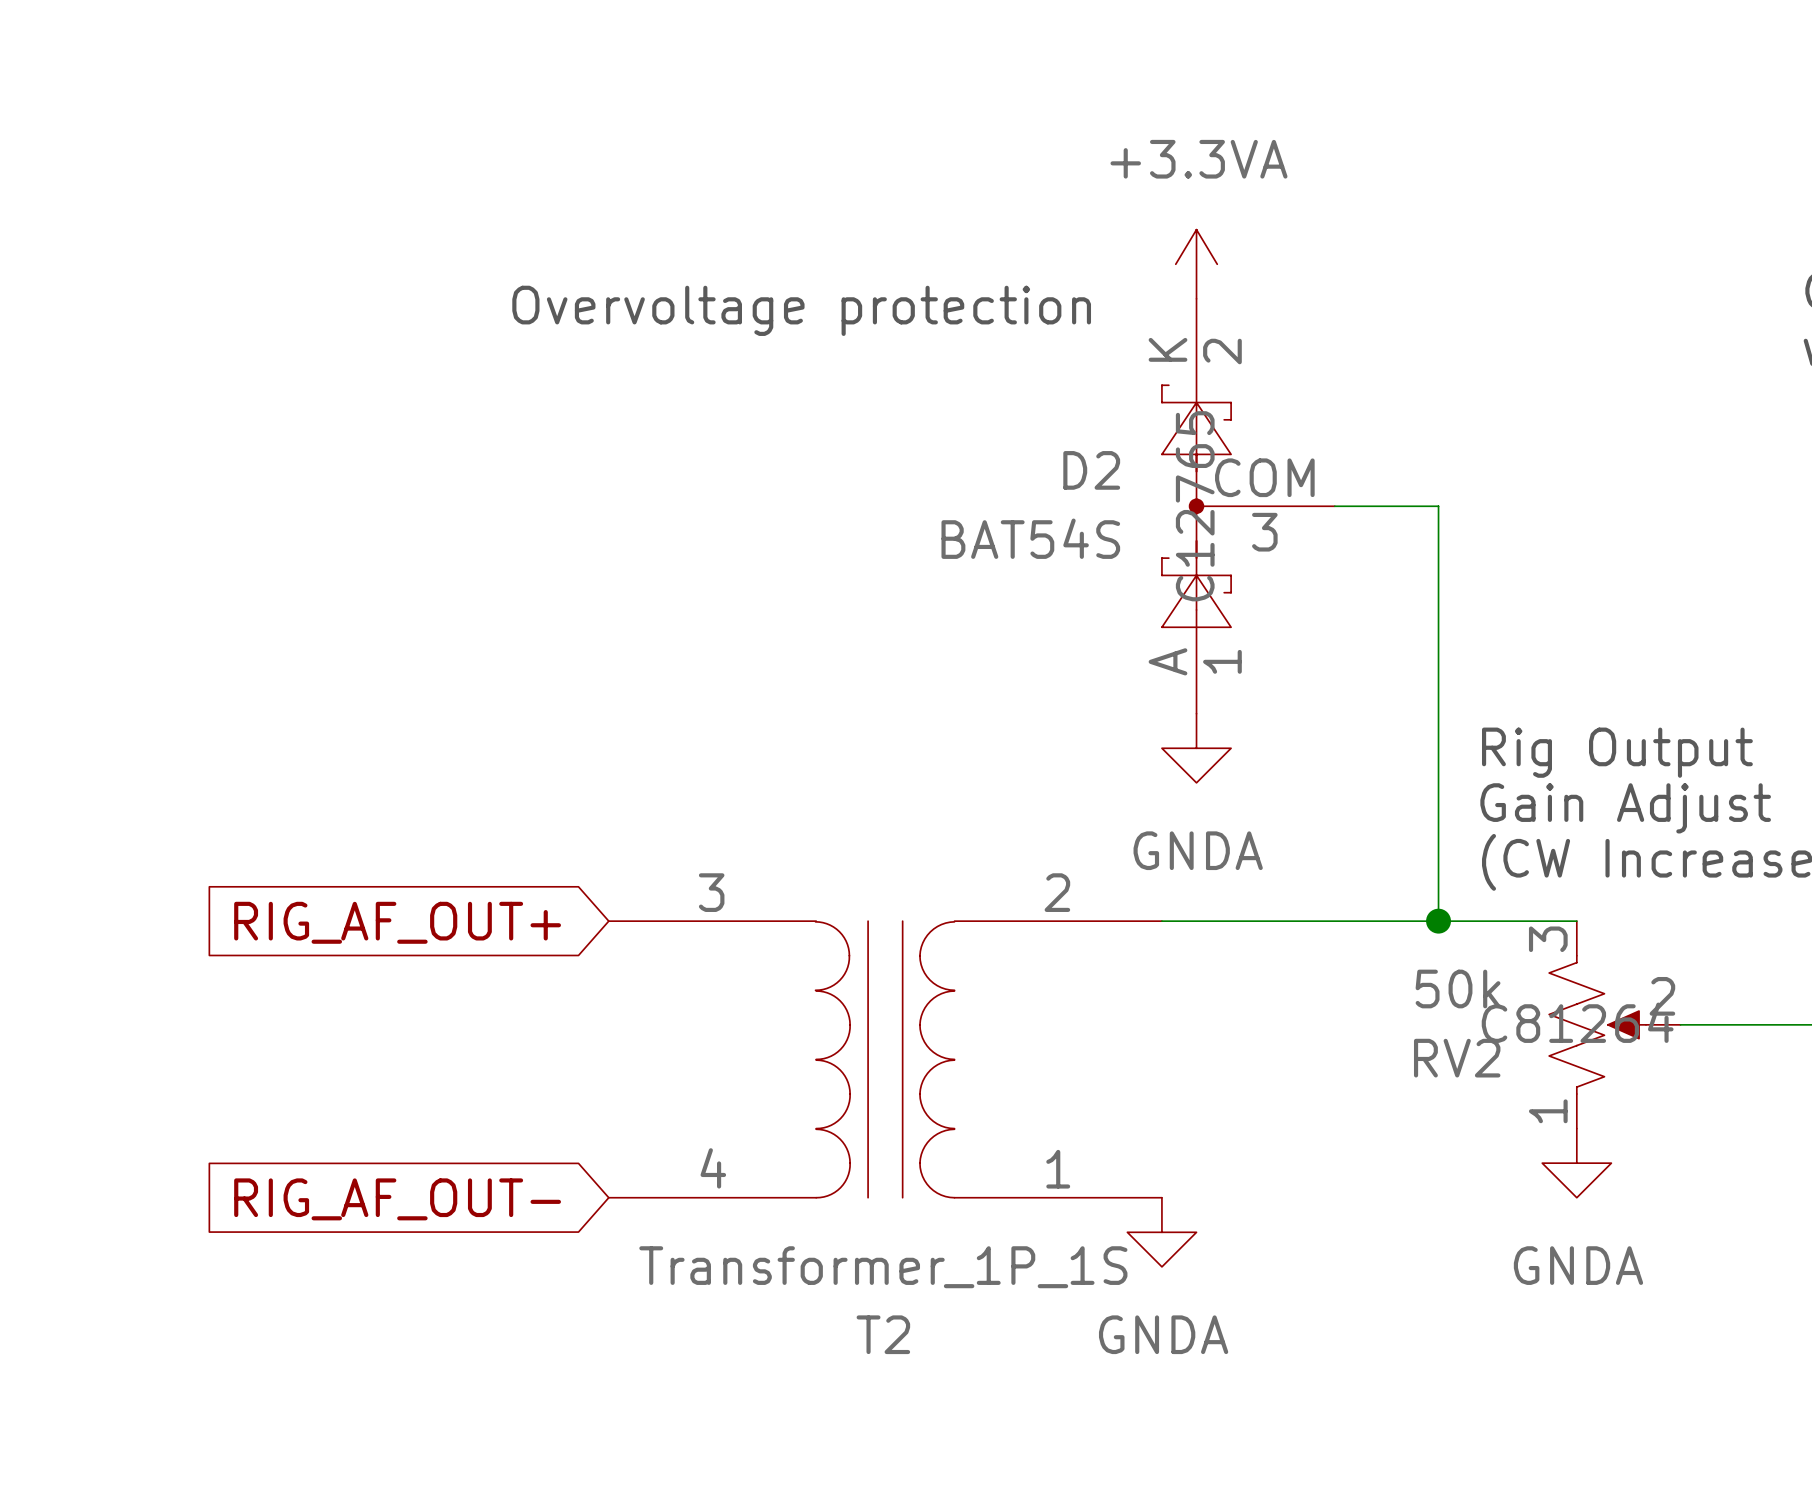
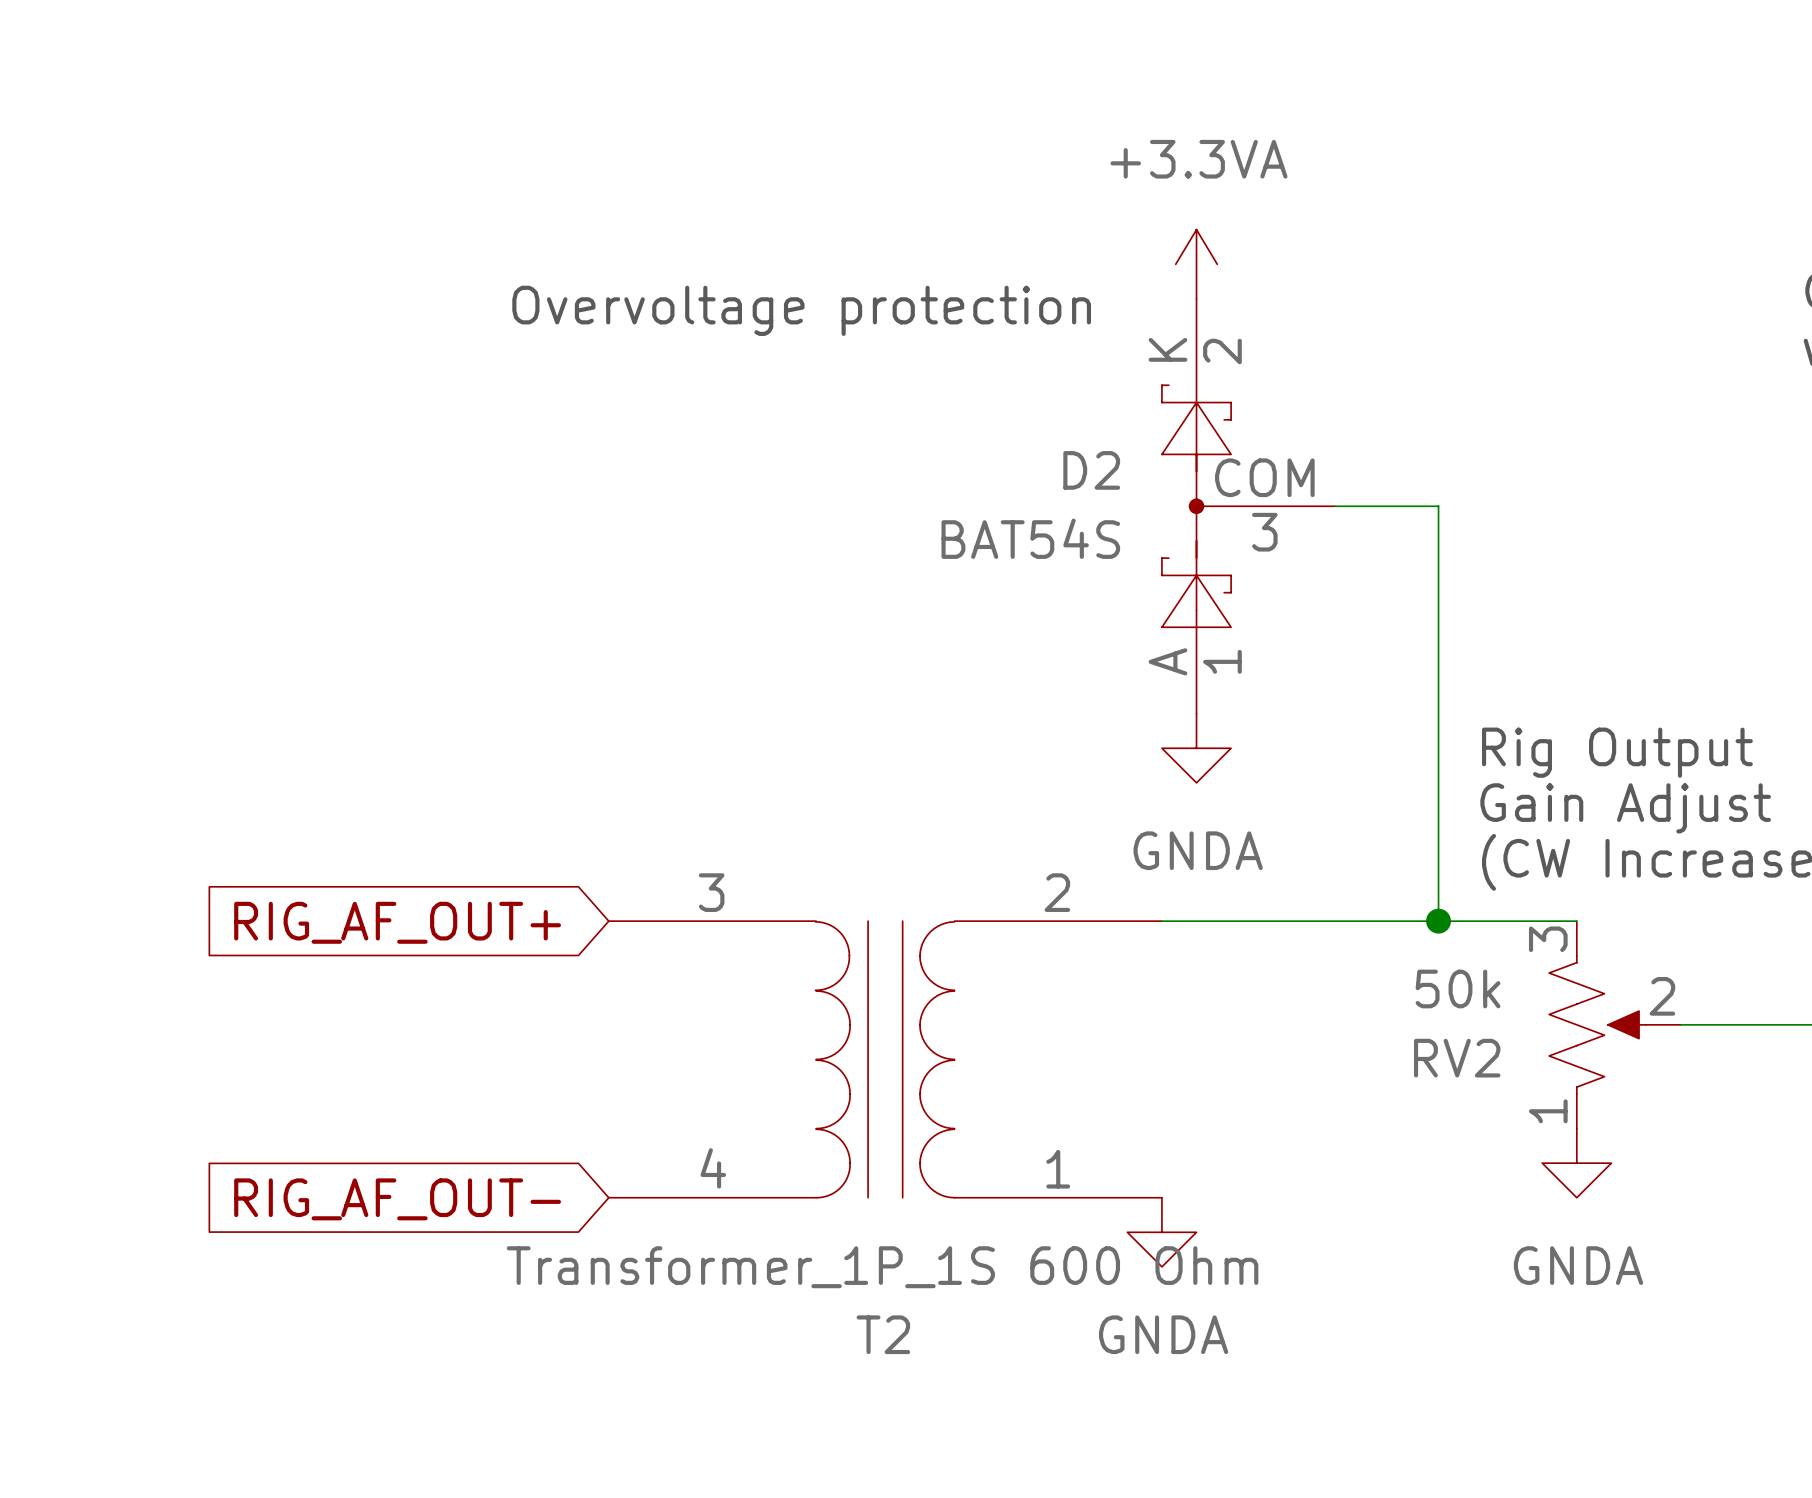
D2 text: C12765 (1195, 506) -> none
RV2 text: C81264 (1577, 1022) -> none
T2 value: Transformer_1P_1S (883, 1267) -> Transformer_1P_1S 600 Ohm (882, 1267)

